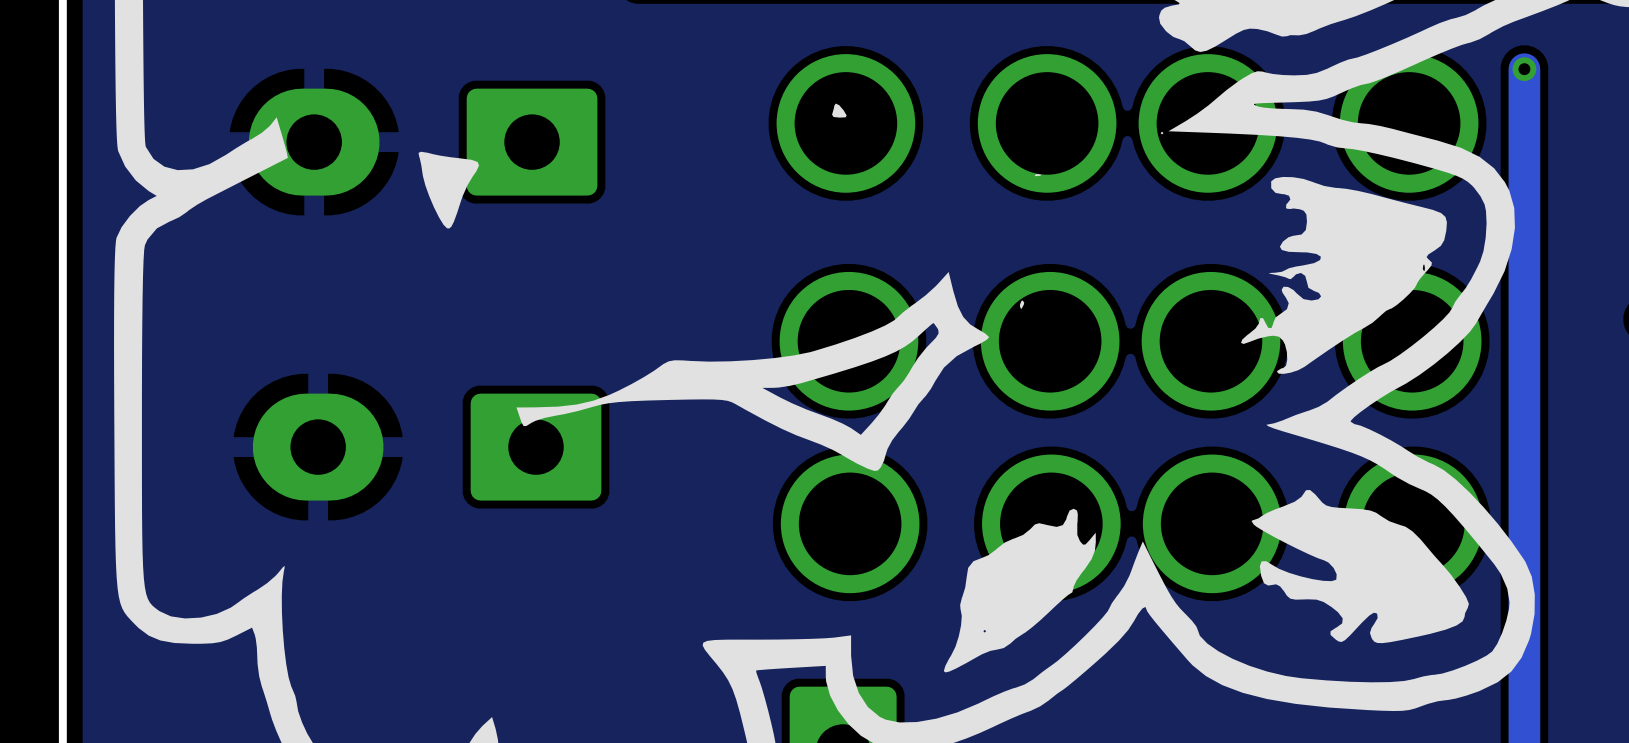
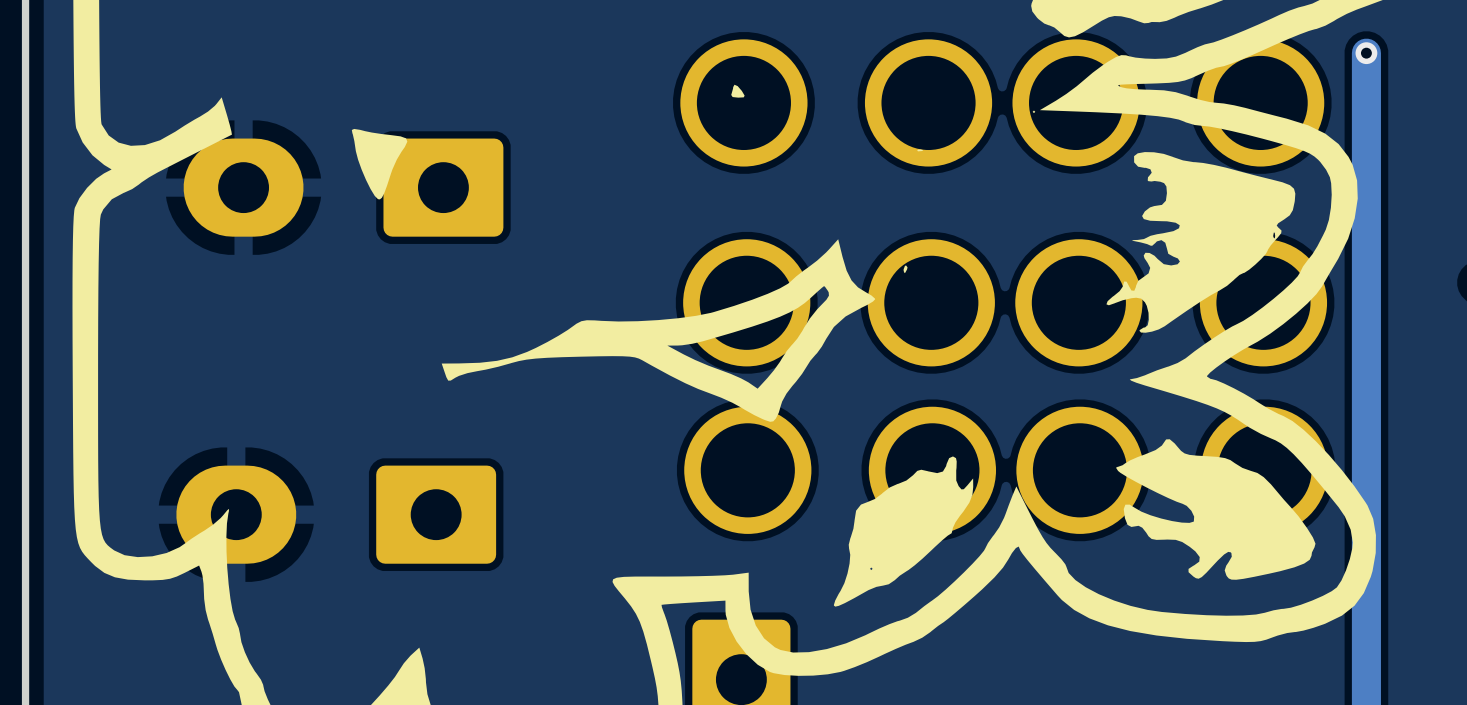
part: (423, 142) -> none
part: none -> (343, 187)
part: (427, 447) -> none
part: none -> (336, 514)

